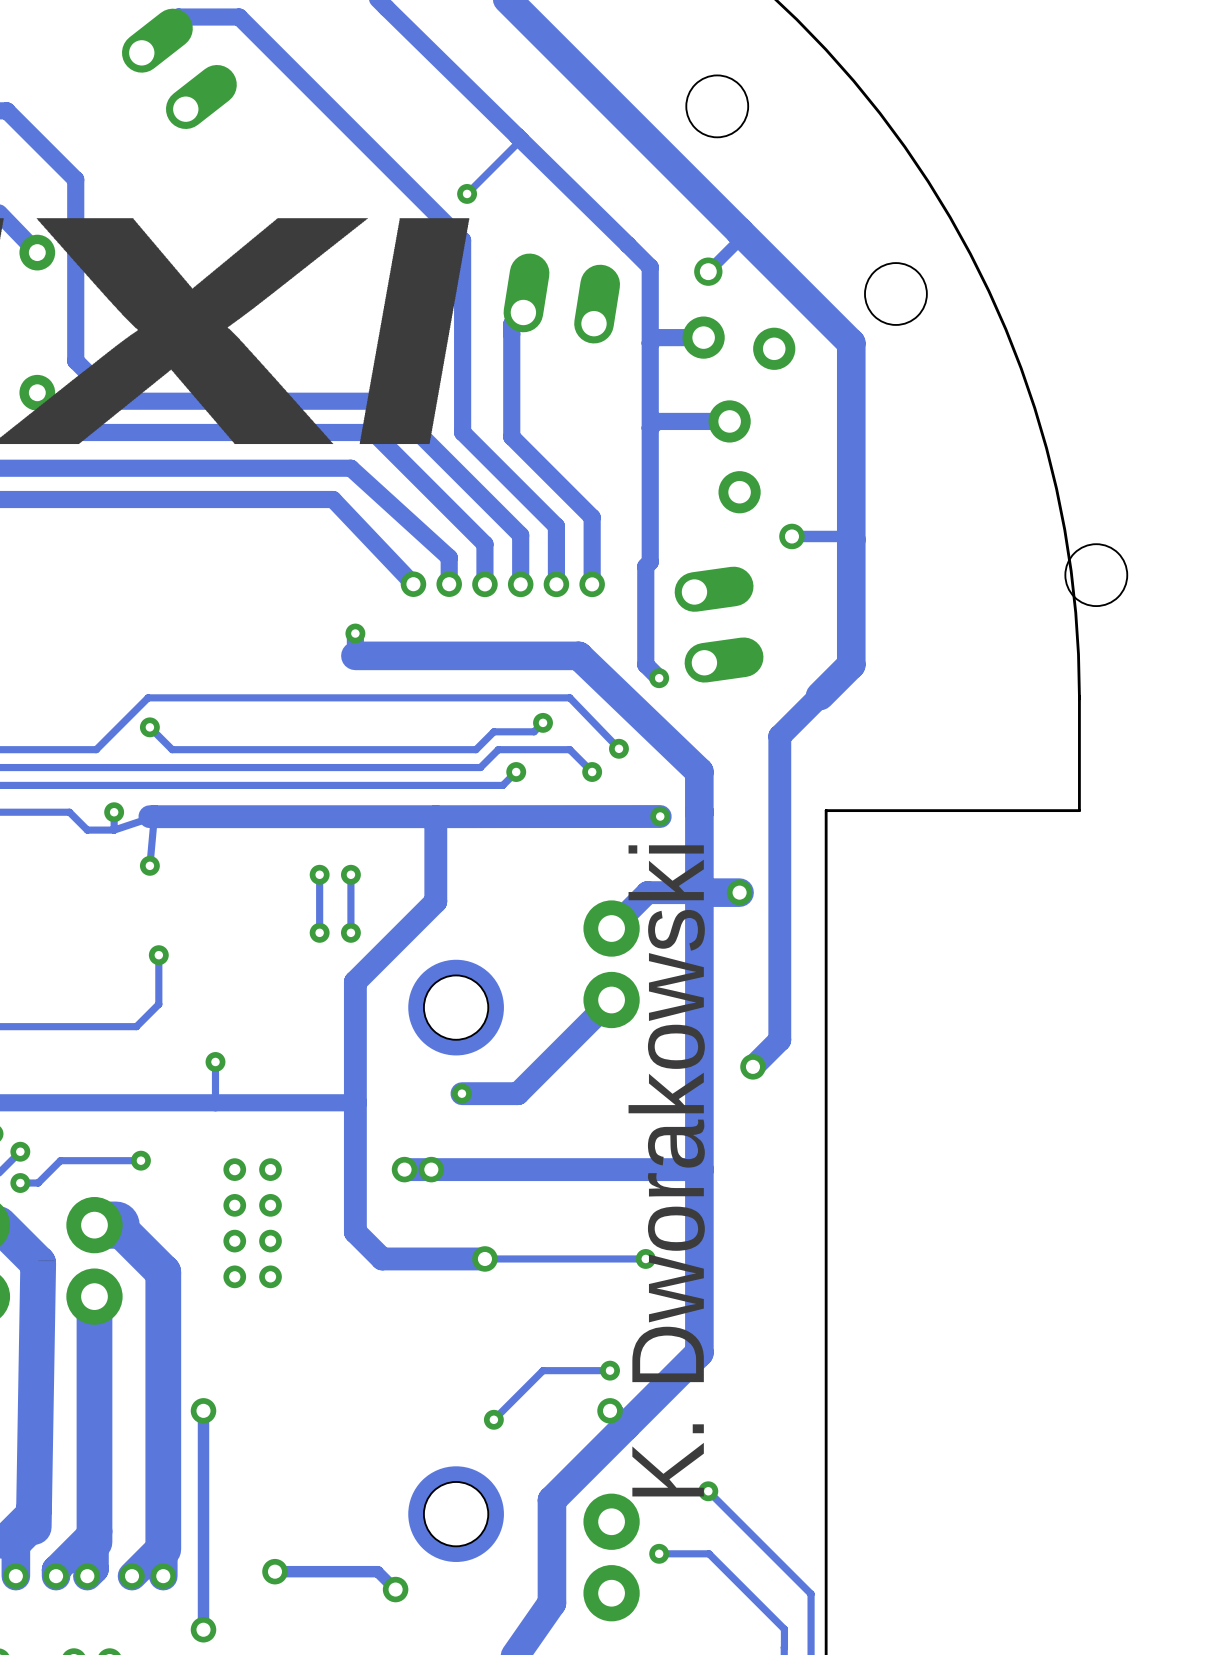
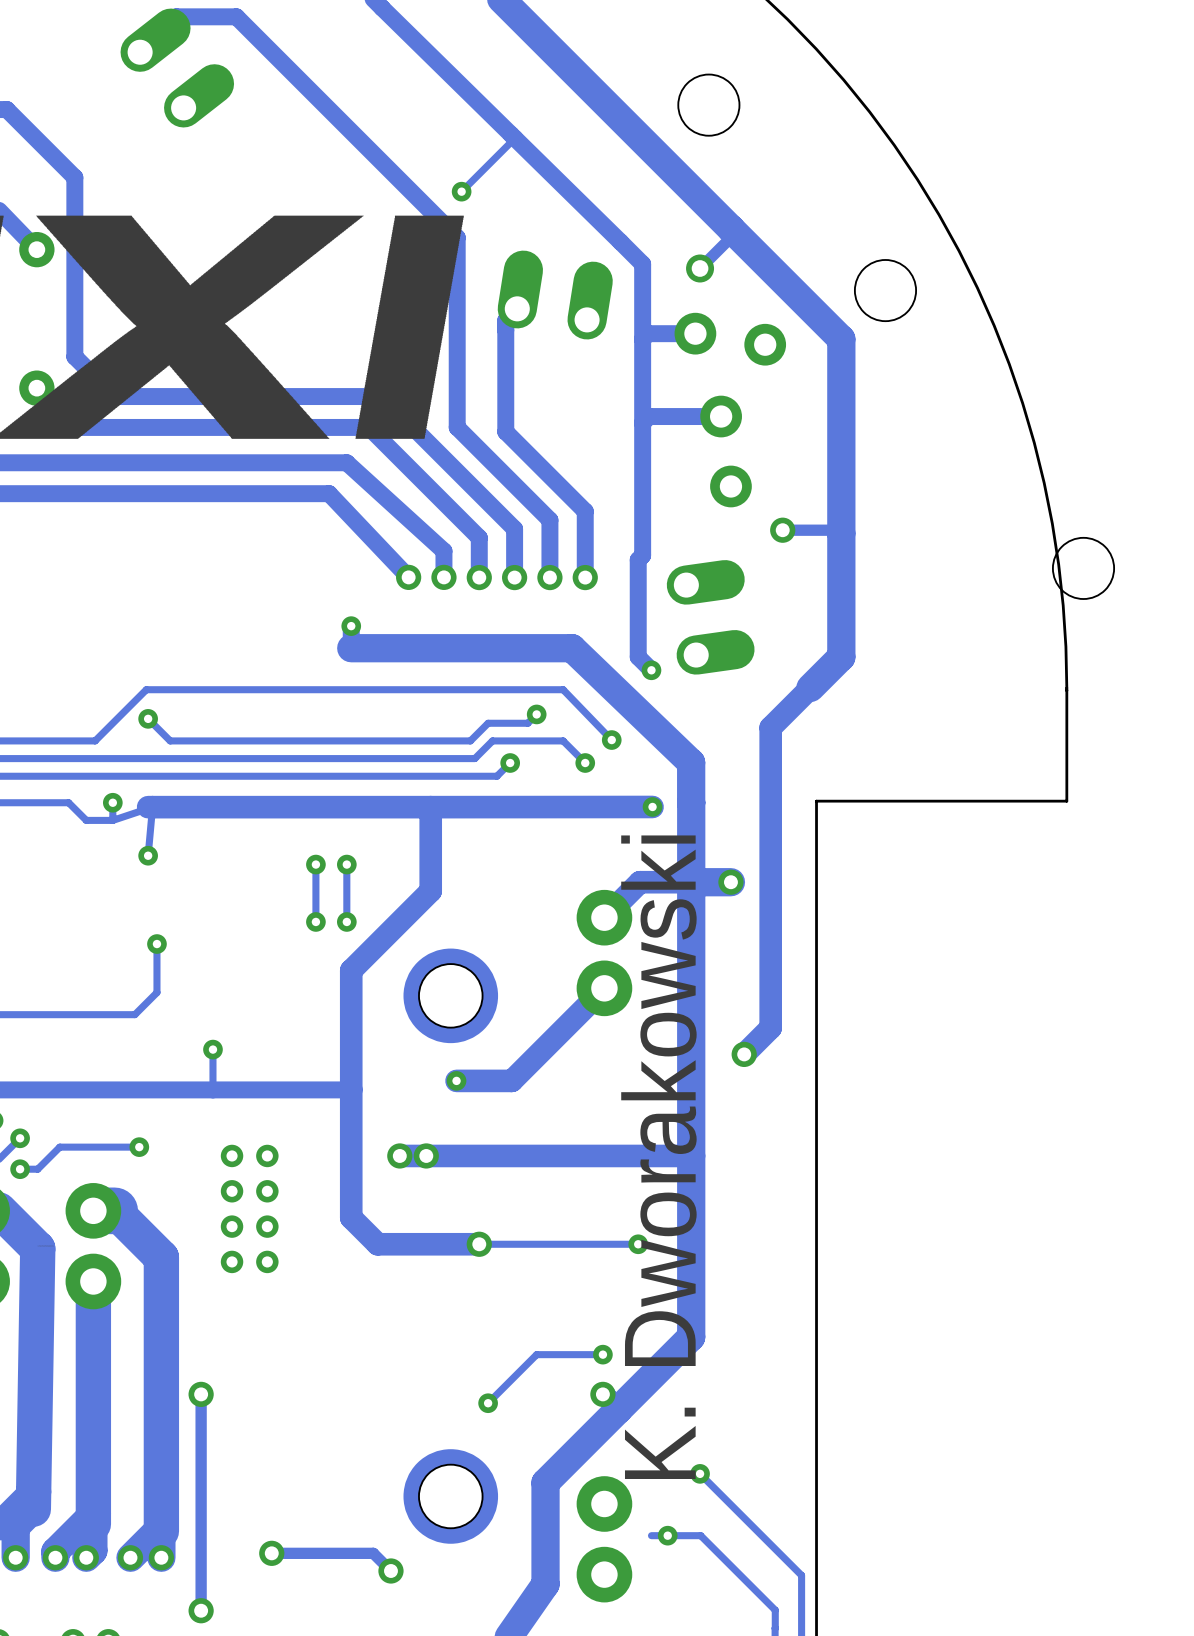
via position: (659, 1553) -> (667, 1535)

